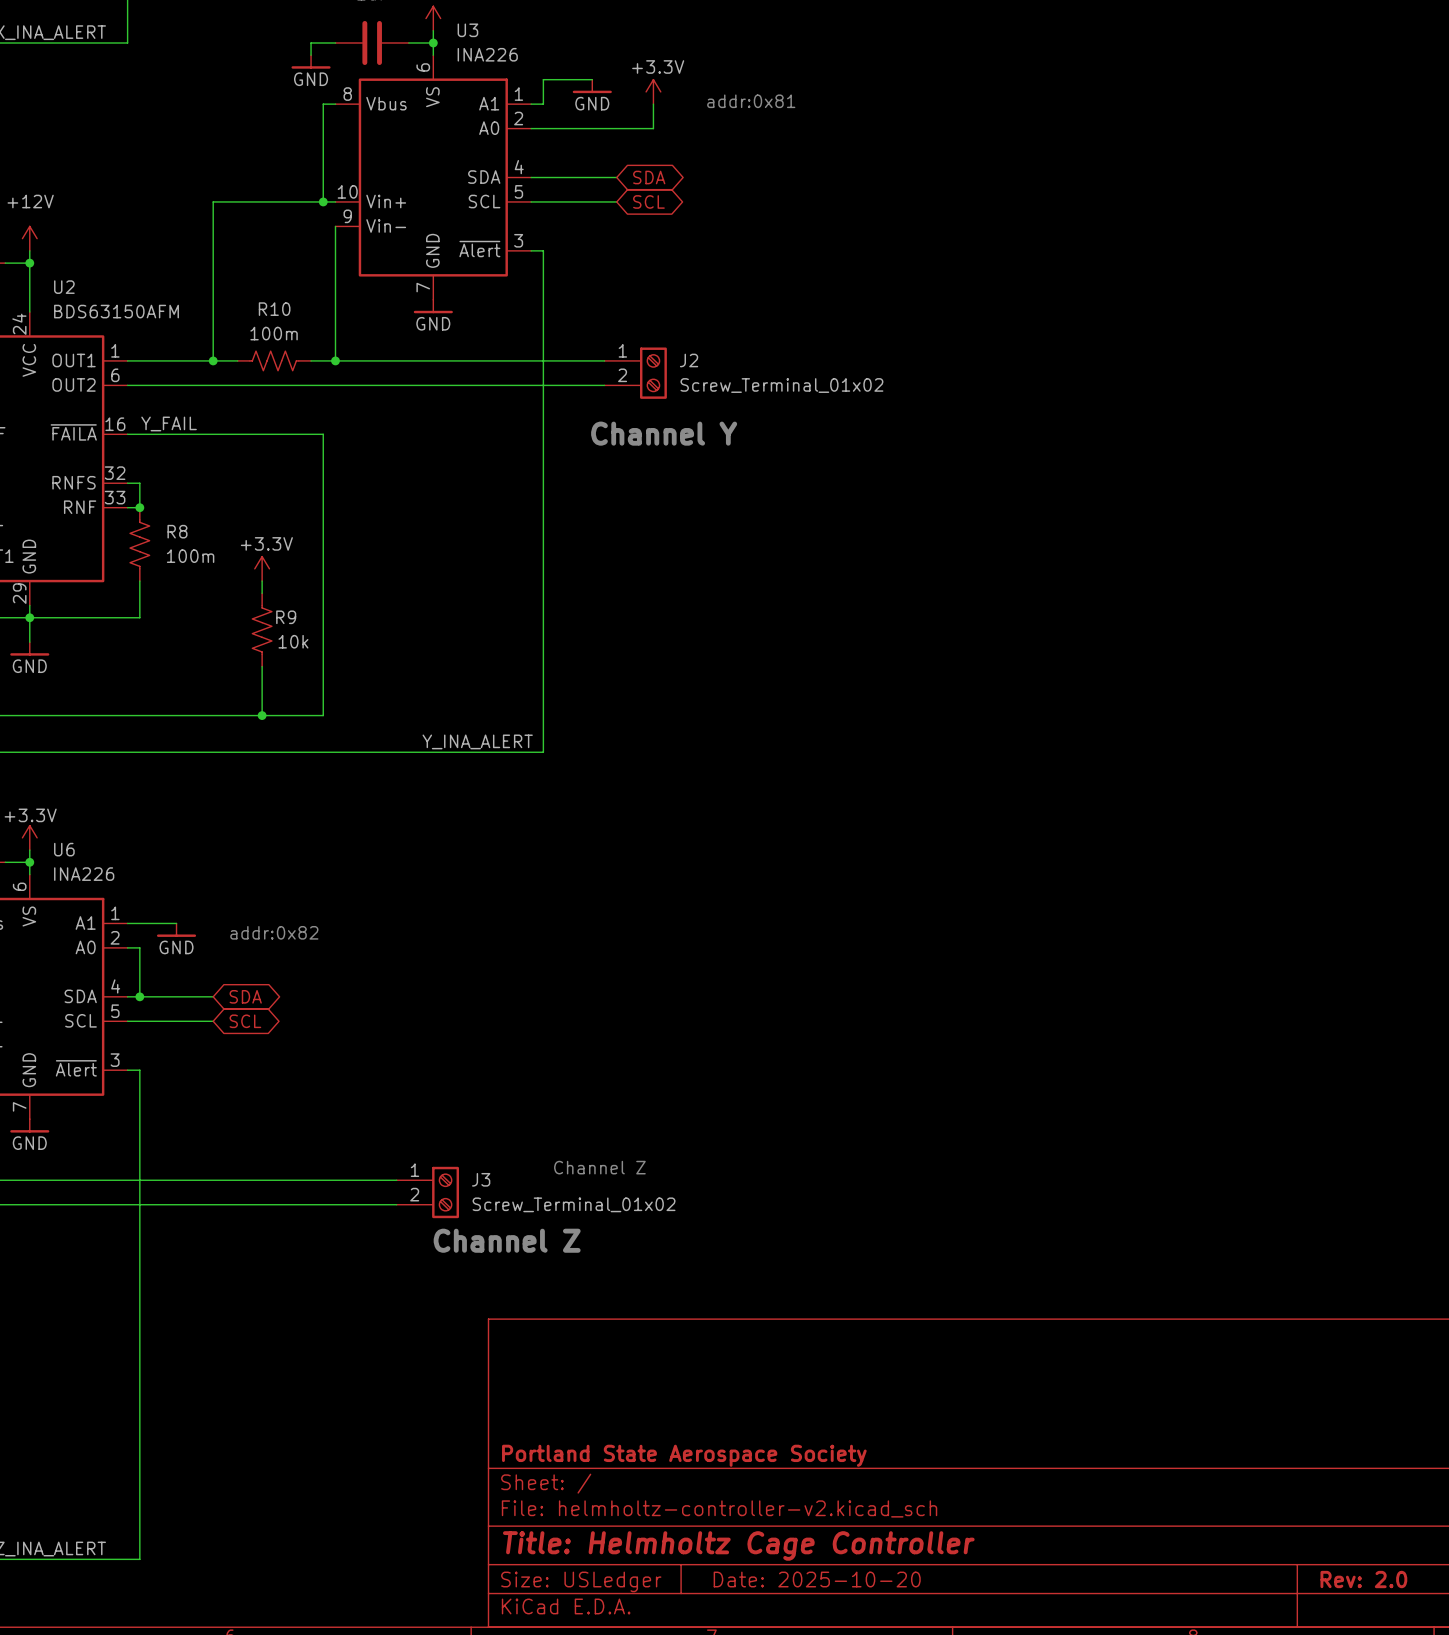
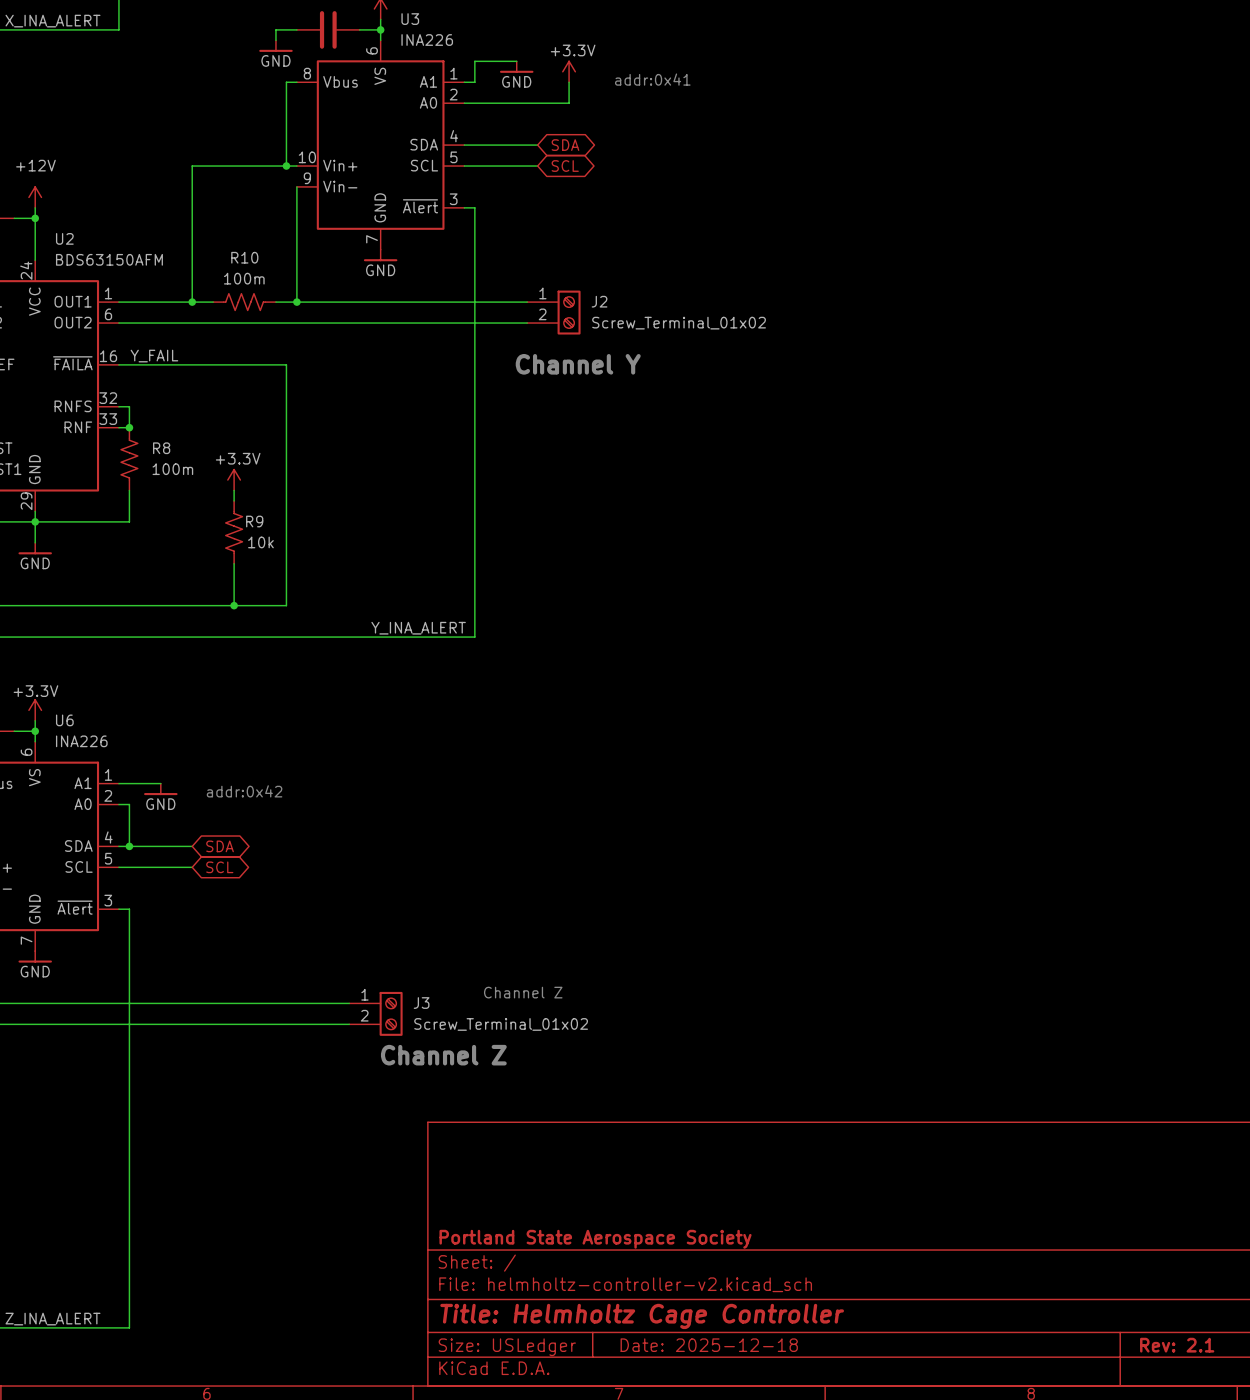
text: addr:0x81 (751, 101) -> addr:0x41 (652, 79)
text: addr:0x82 (274, 932) -> addr:0x42 (244, 791)
title block: Date: 2025-10-20 (817, 1579) -> Date: 2025-12-18 (709, 1345)
title block: Rev: 2.0 (1363, 1579) -> Rev: 2.1 (1177, 1345)

